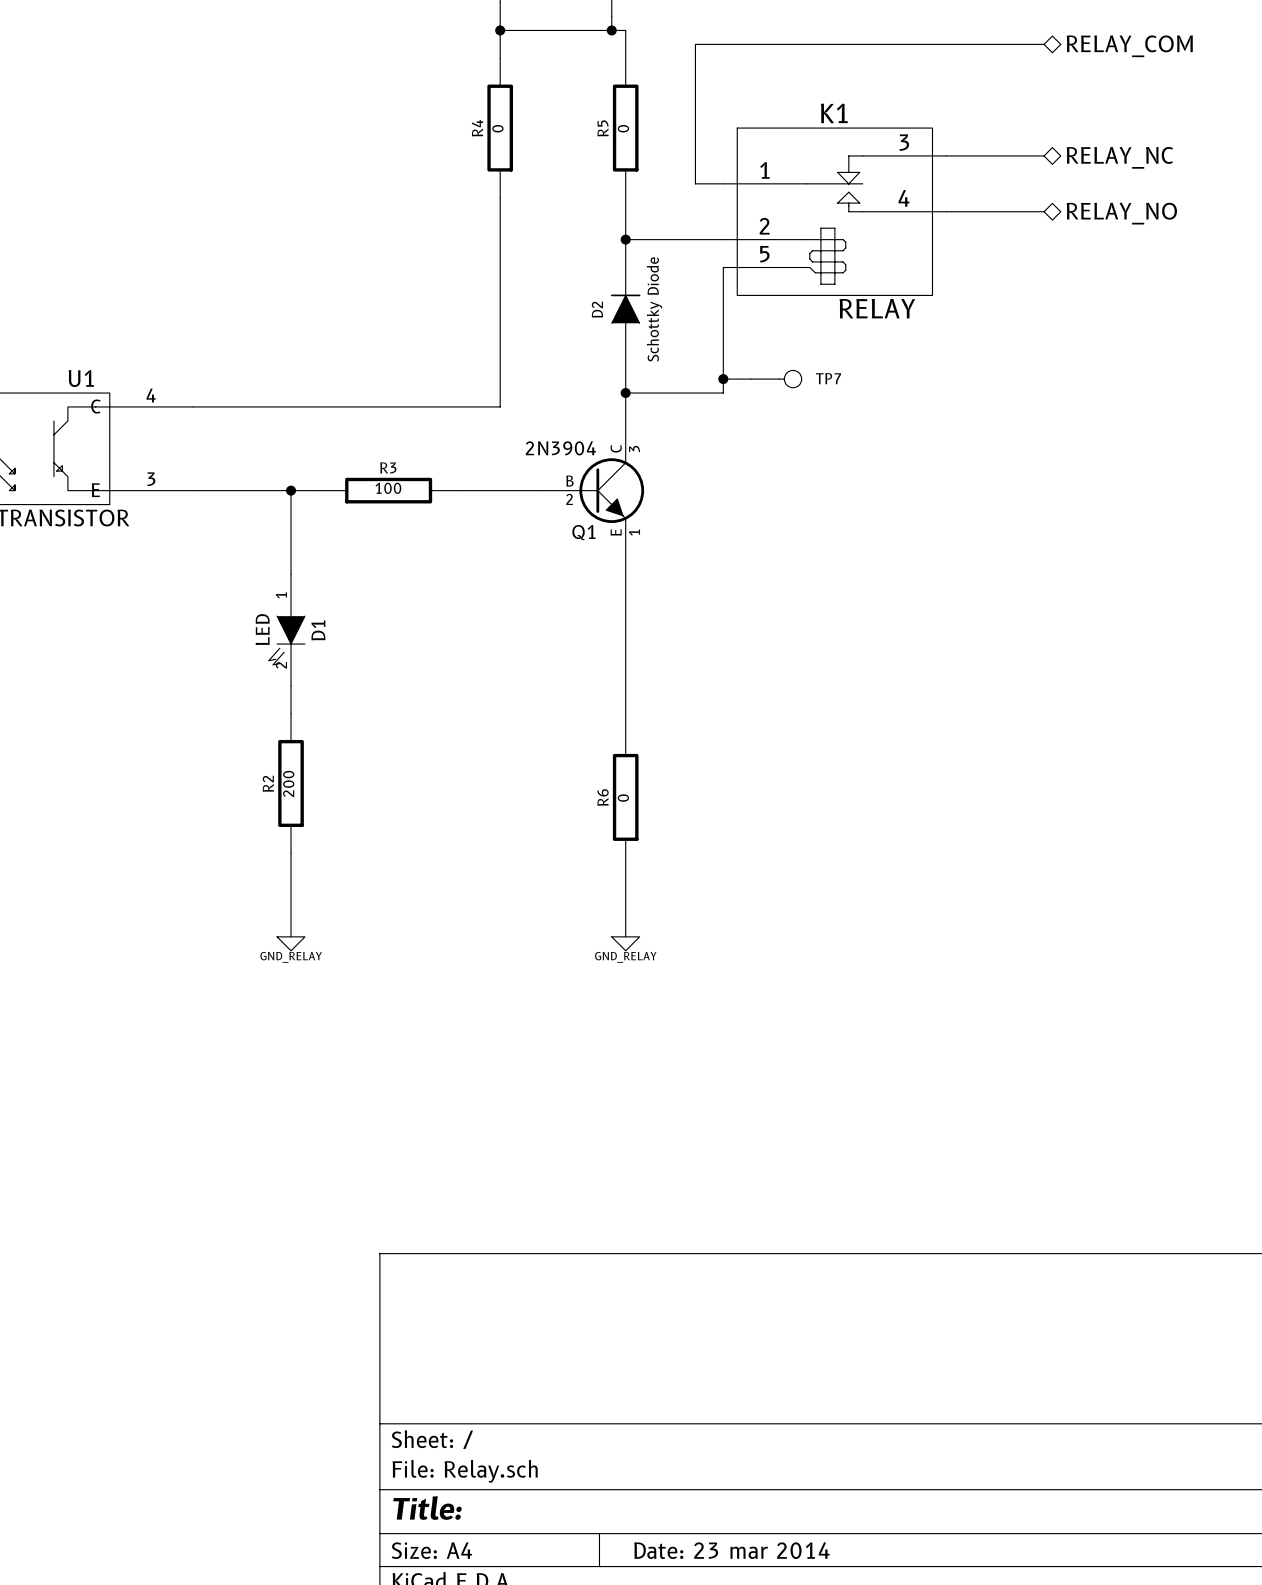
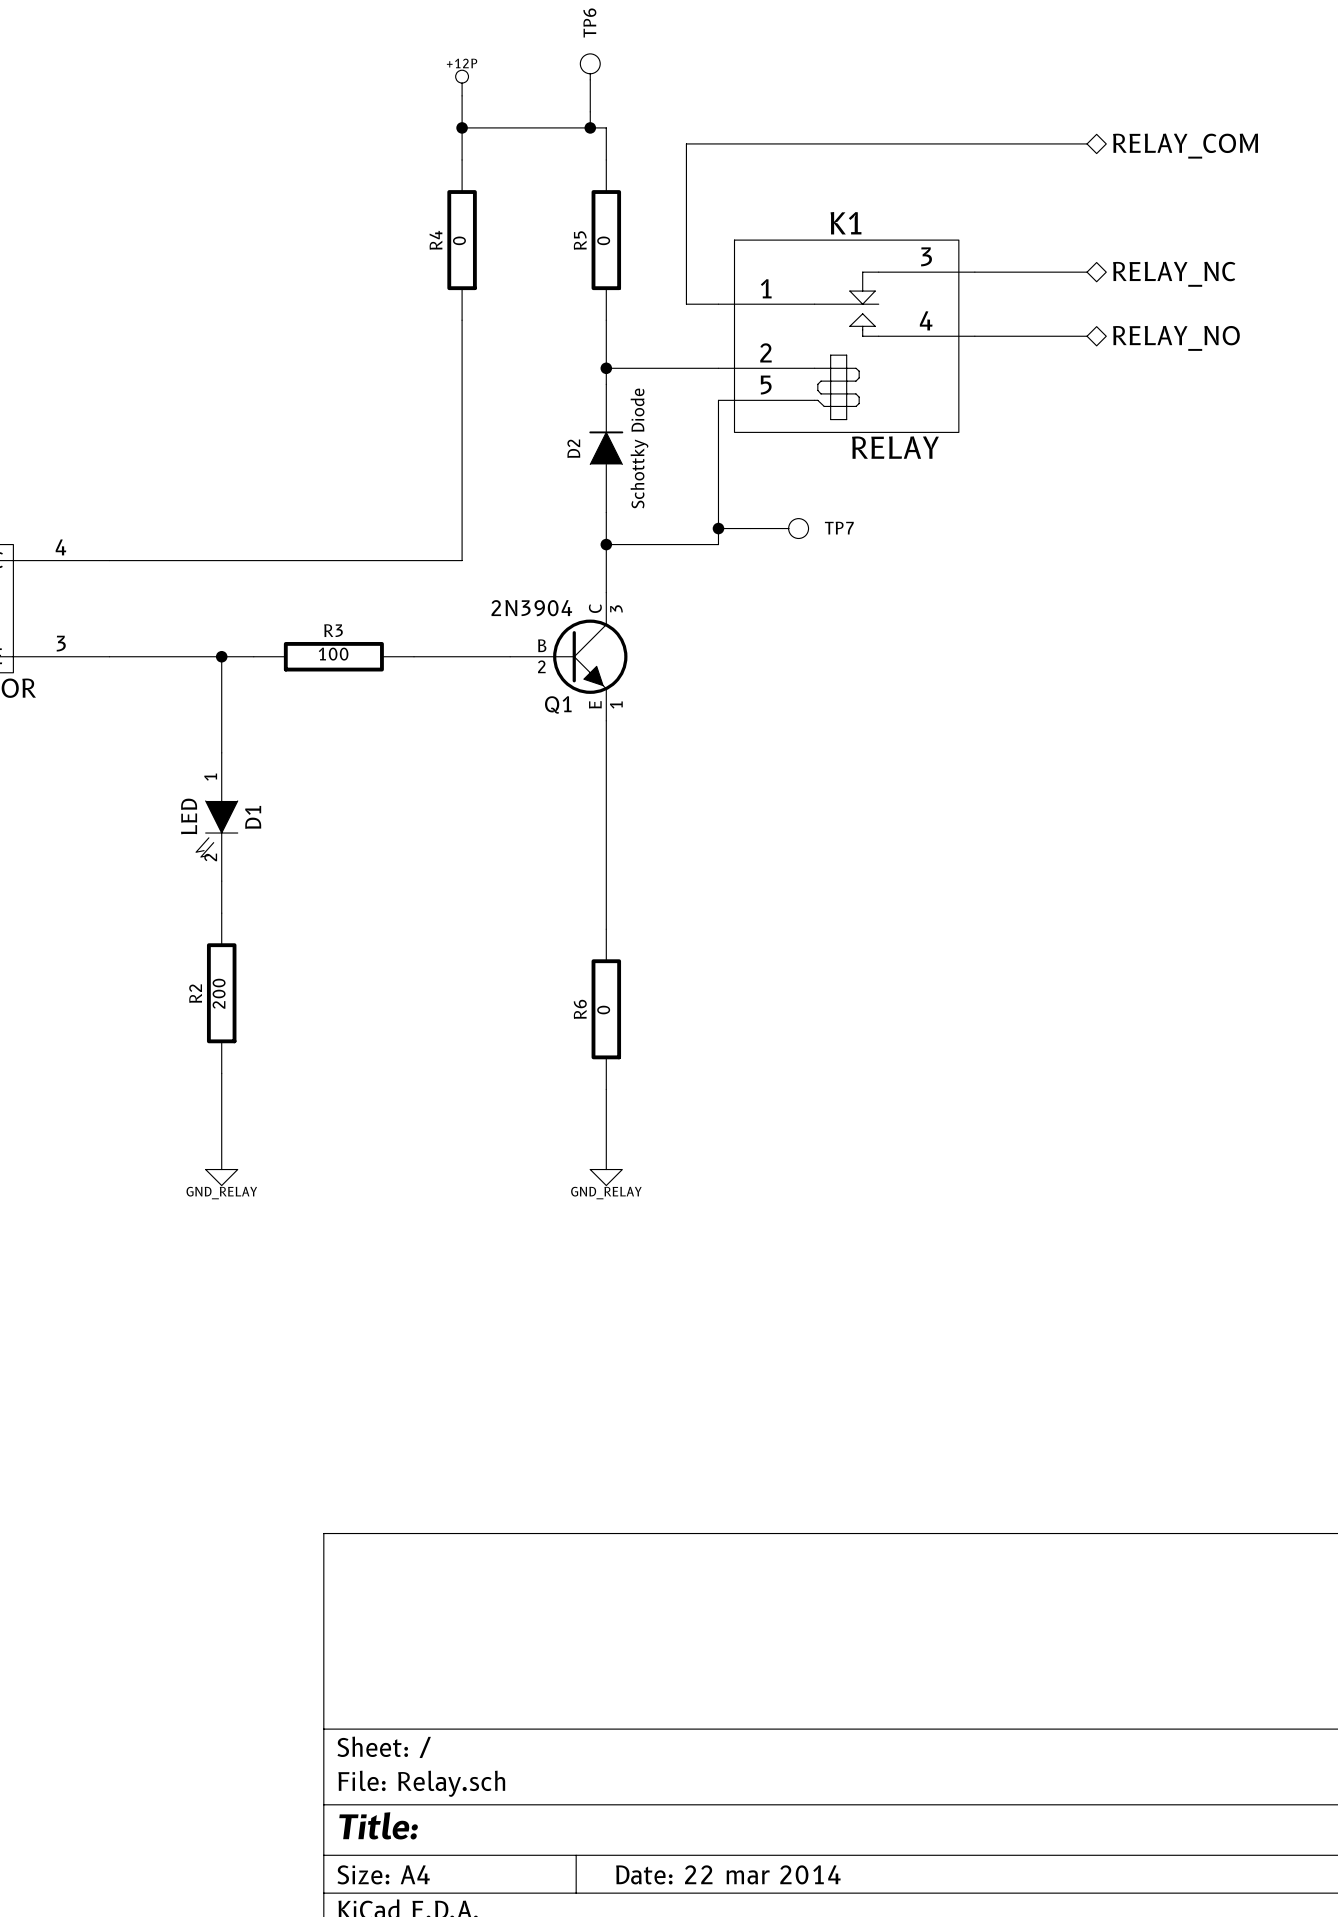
title block: Date: 23 mar 2014 (731, 1550) -> Date: 22 mar 2014 (728, 1874)

